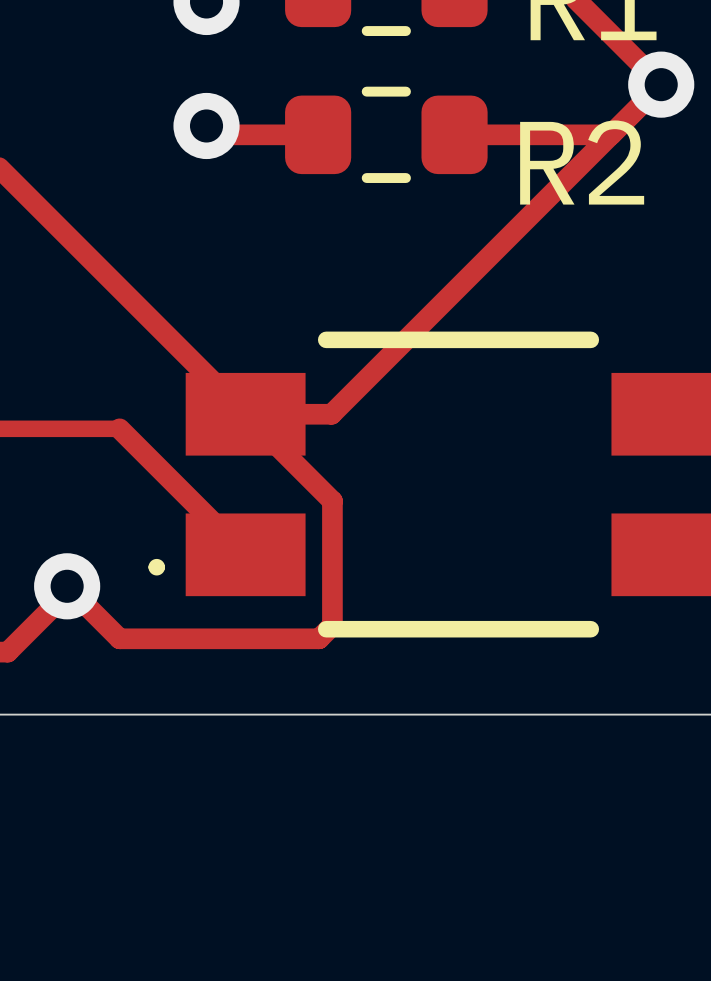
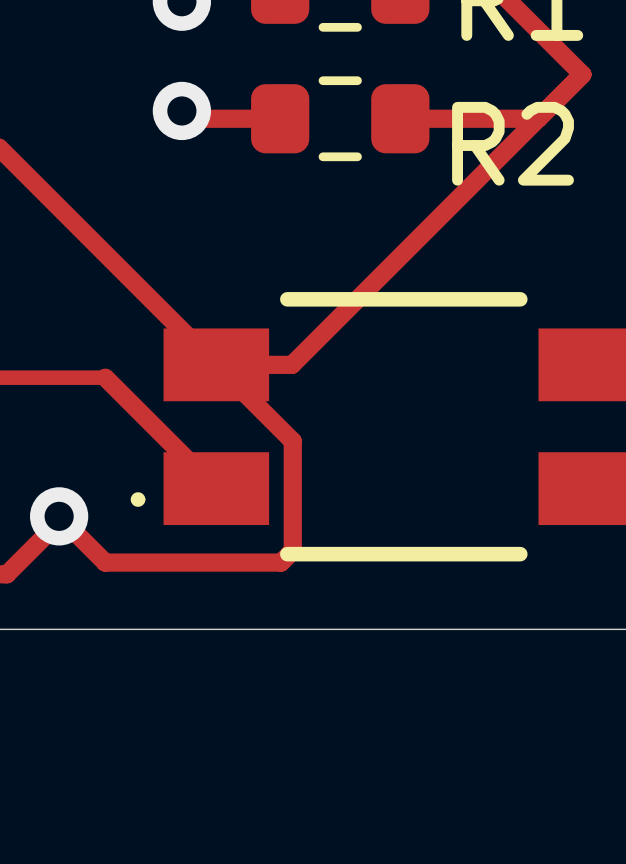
via: (661, 84) -> none

